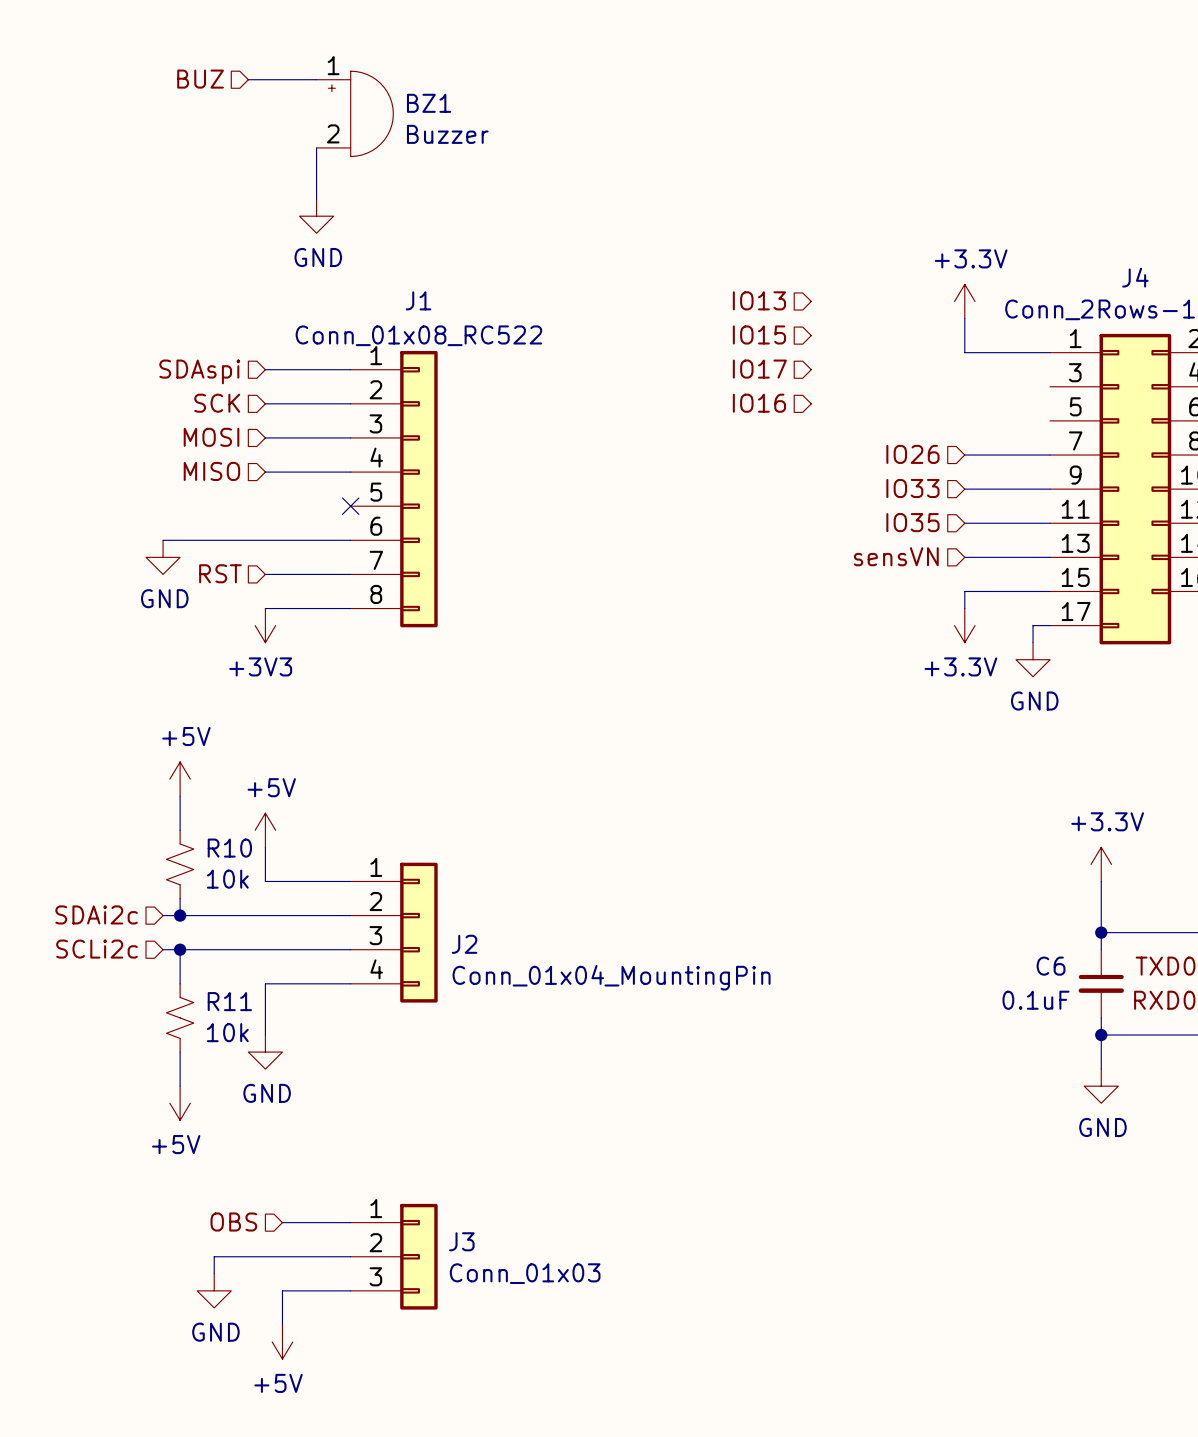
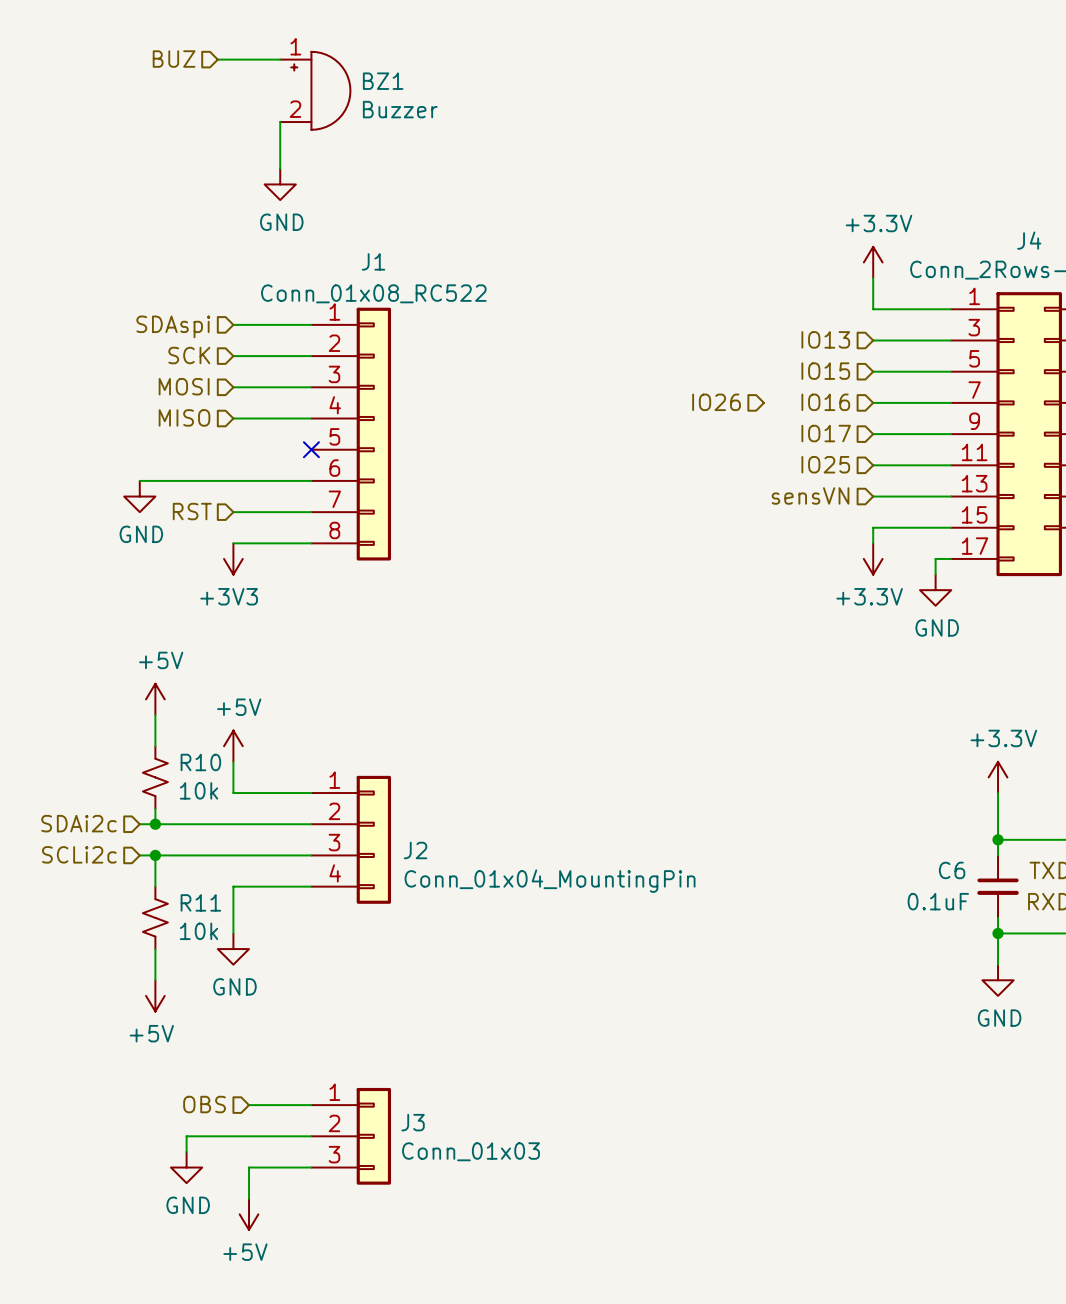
hierarchical label position: IO13 (759, 300) -> IO13 (825, 339)
hierarchical label position: IO15 (759, 334) -> IO15 (825, 371)
hierarchical label: IO17 (759, 369) -> none
wire: none -> (873, 340) (951, 340)
hierarchical label: IO16 (759, 403) -> none
wire: none -> (873, 371) (951, 371)
hierarchical label: none -> IO26 (716, 402)
hierarchical label: IO26 (912, 454) -> IO16 (825, 402)
hierarchical label: IO33 (912, 488) -> IO17 (826, 433)
hierarchical label: IO35 (912, 522) -> IO25 (825, 464)

